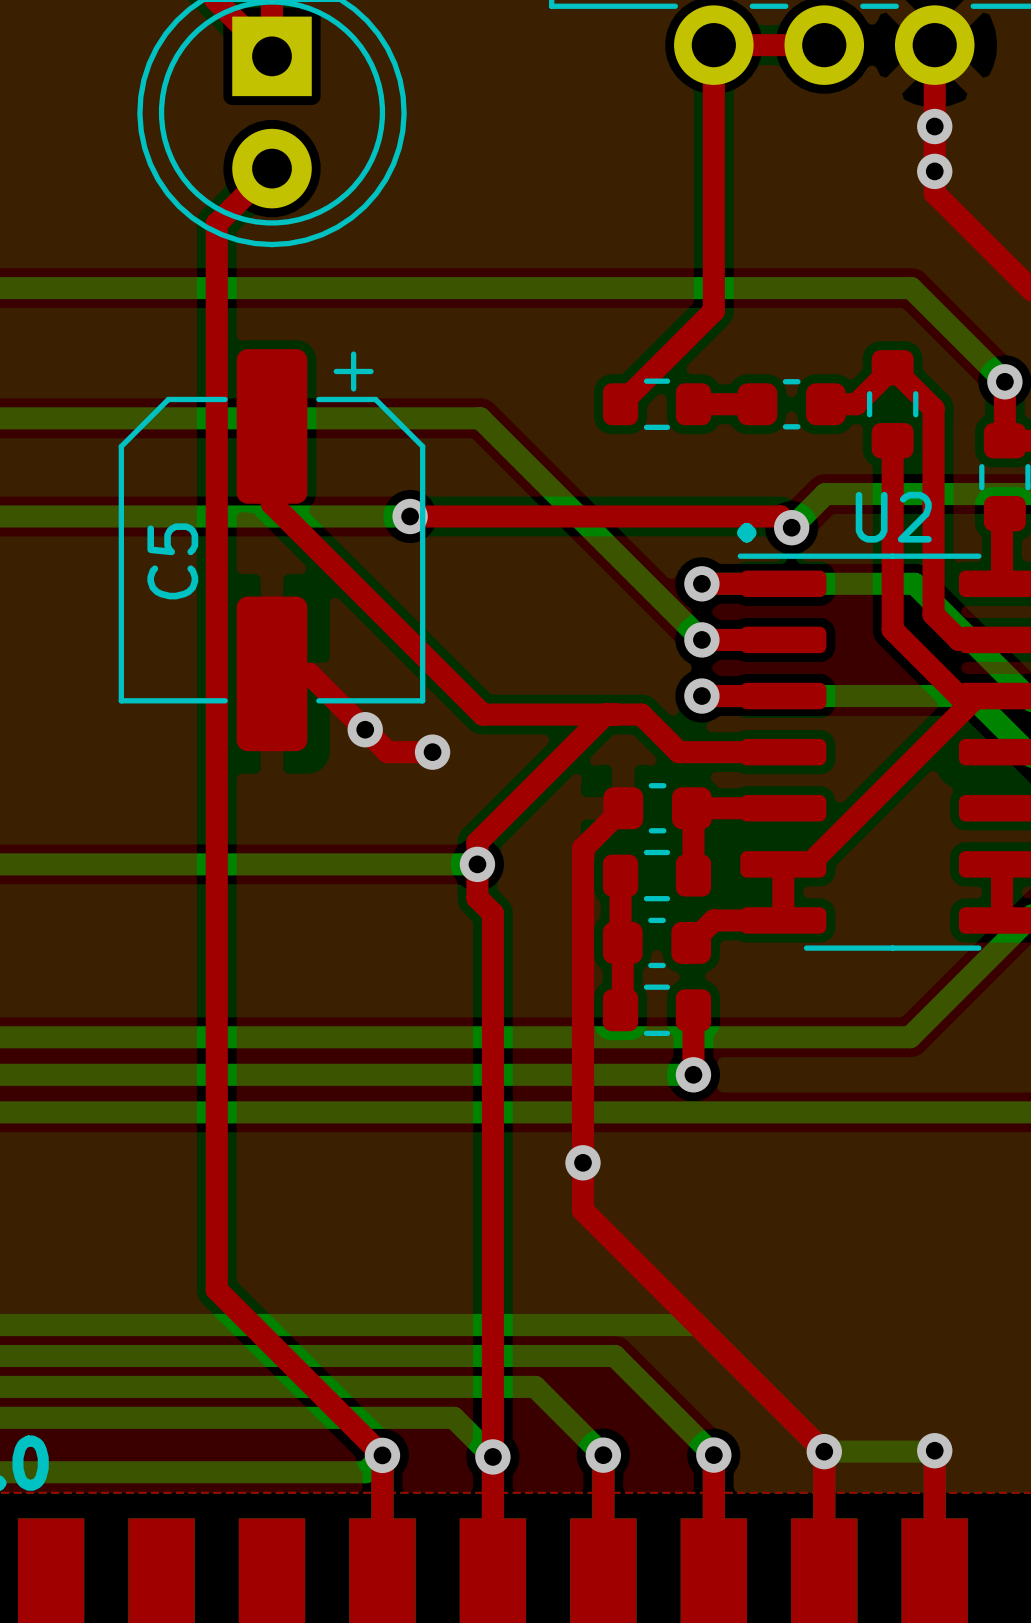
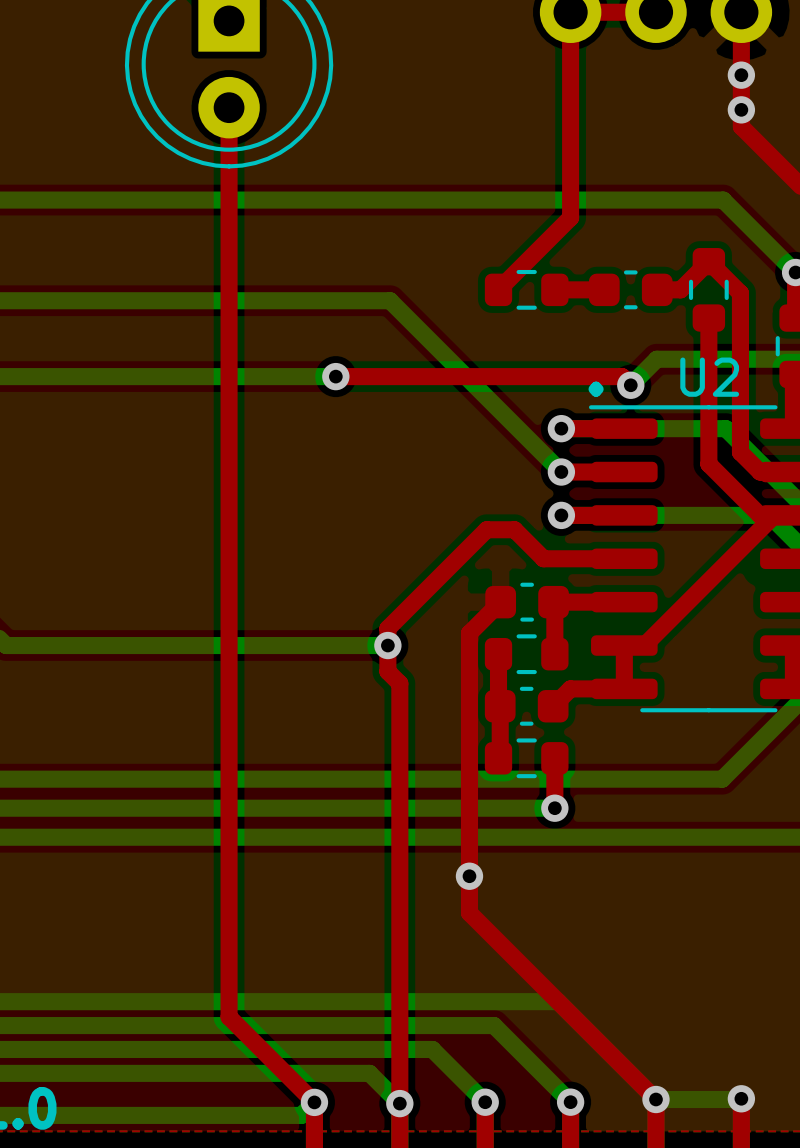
top track: (272, 168) (216, 223) (216, 1289) (272, 1344) -> (229, 366) (229, 1017)
top track: none -> (229, 107) (229, 307)
top track: (272, 503) (482, 714) (605, 714) -> none
C5: (272, 550) -> none
top track: (272, 673) (309, 673) (387, 752) (432, 752) -> none
via: (365, 729) -> none
via: (432, 752) -> none

